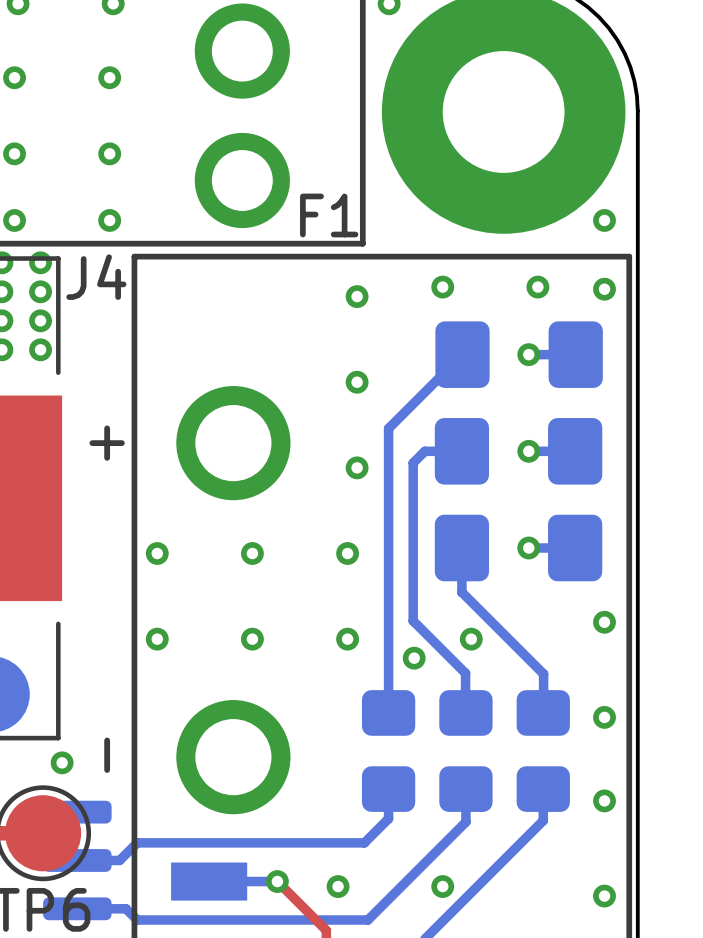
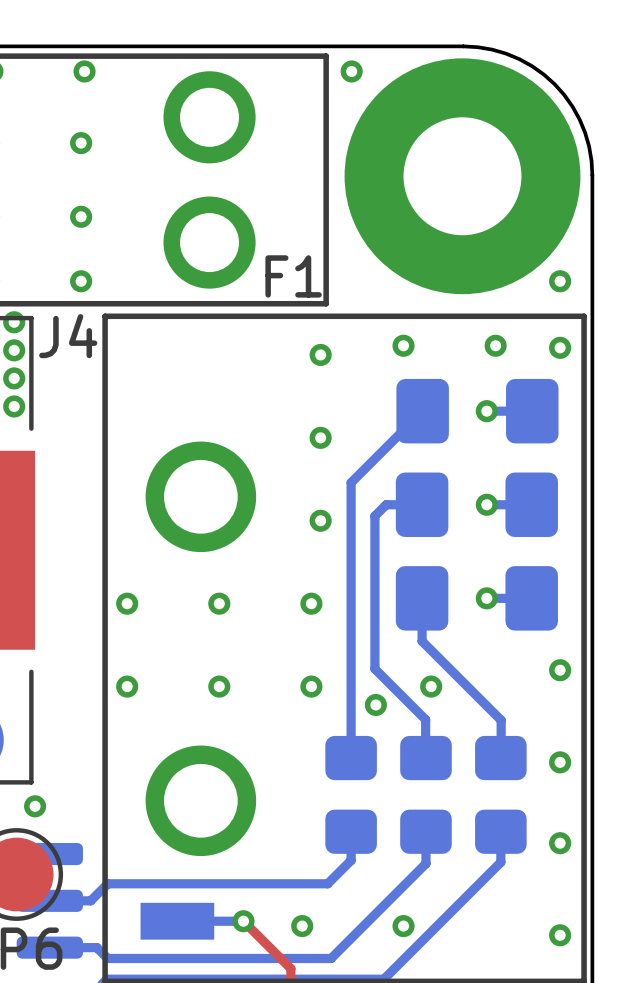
text: + (107, 443) -> none
text: - (107, 755) -> none

